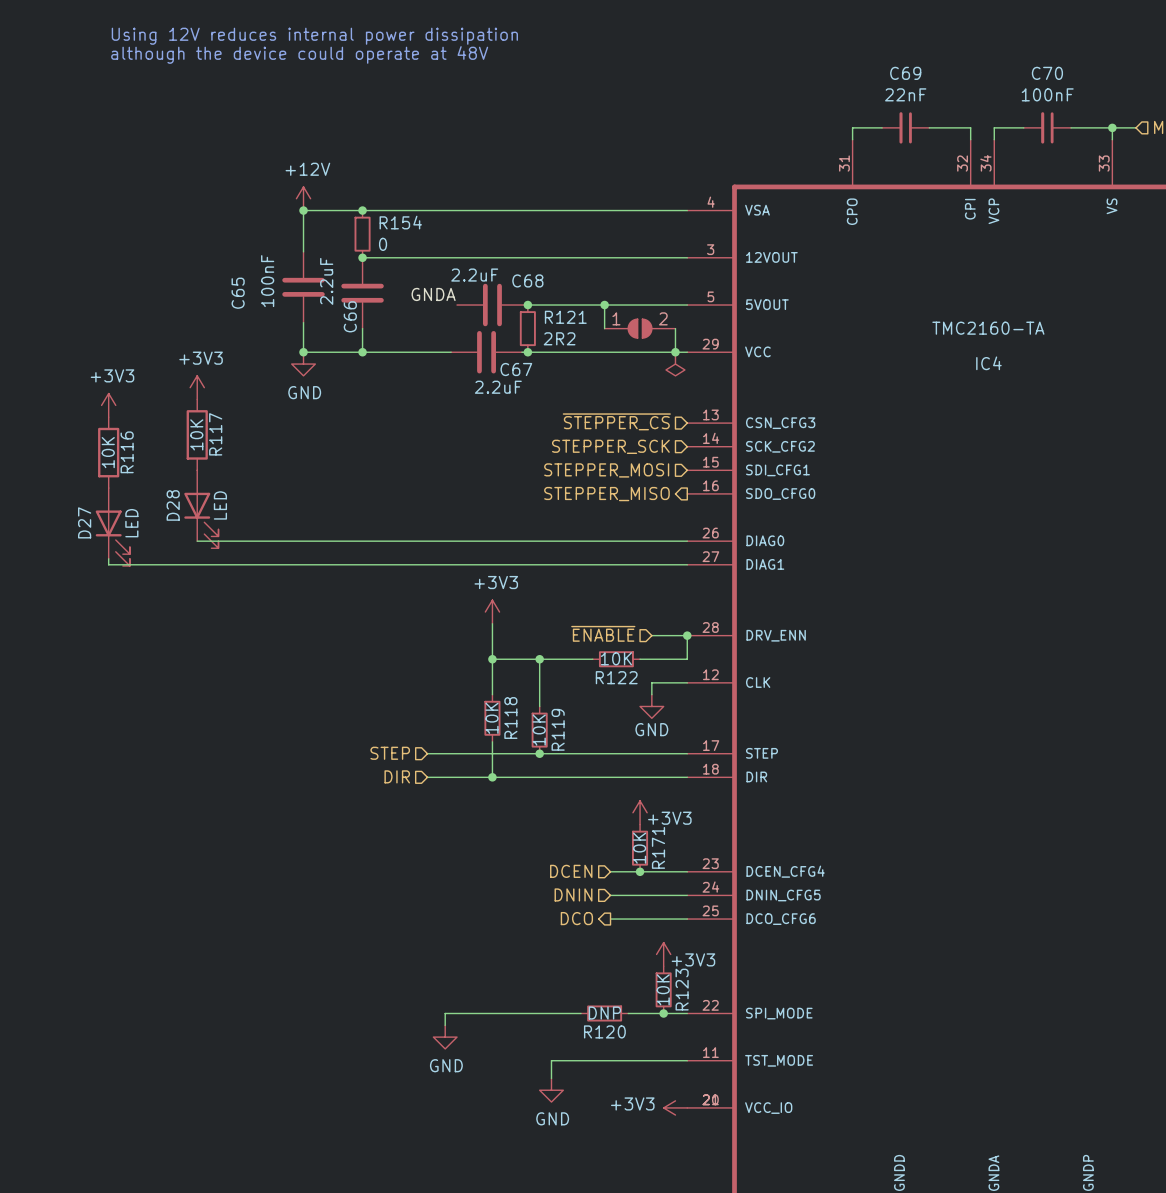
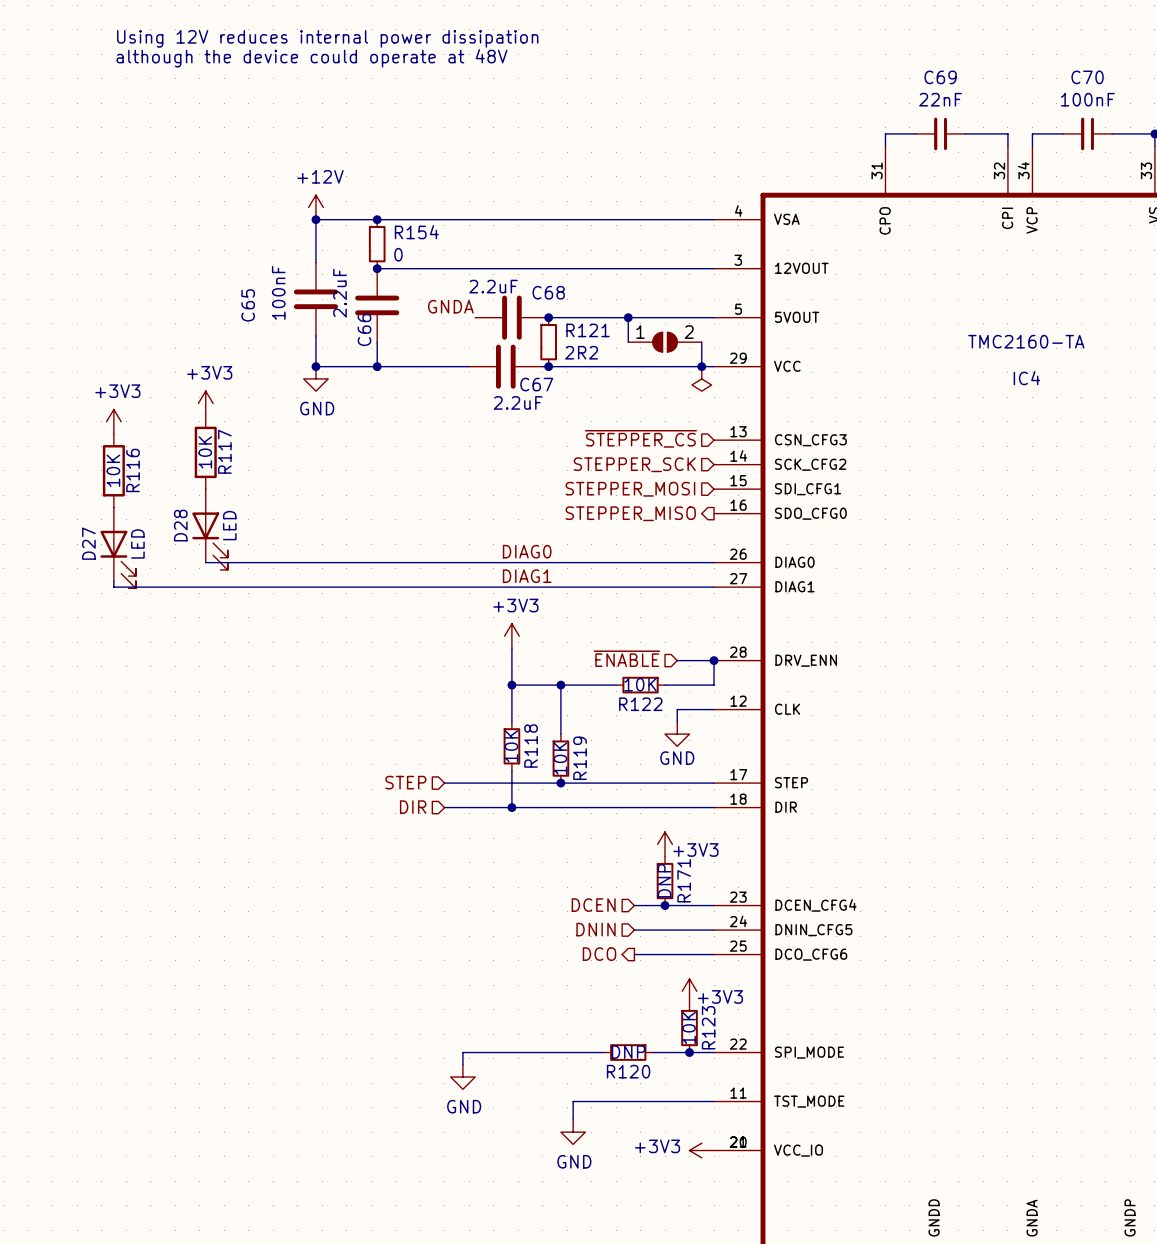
label: none -> DIAG0 (527, 551)
label: none -> DIAG1 (527, 576)
R171 value: 10K (639, 848) -> DNP (664, 880)

